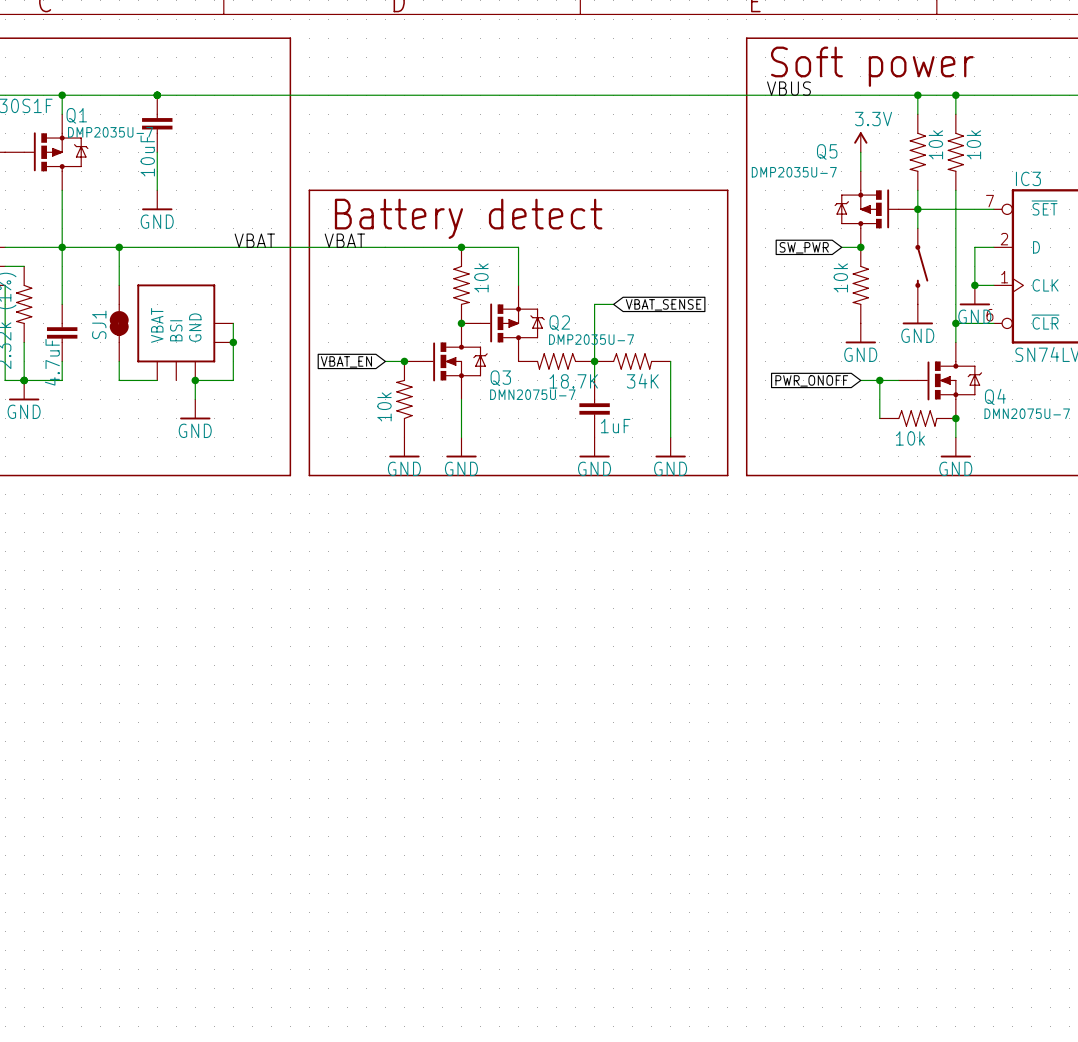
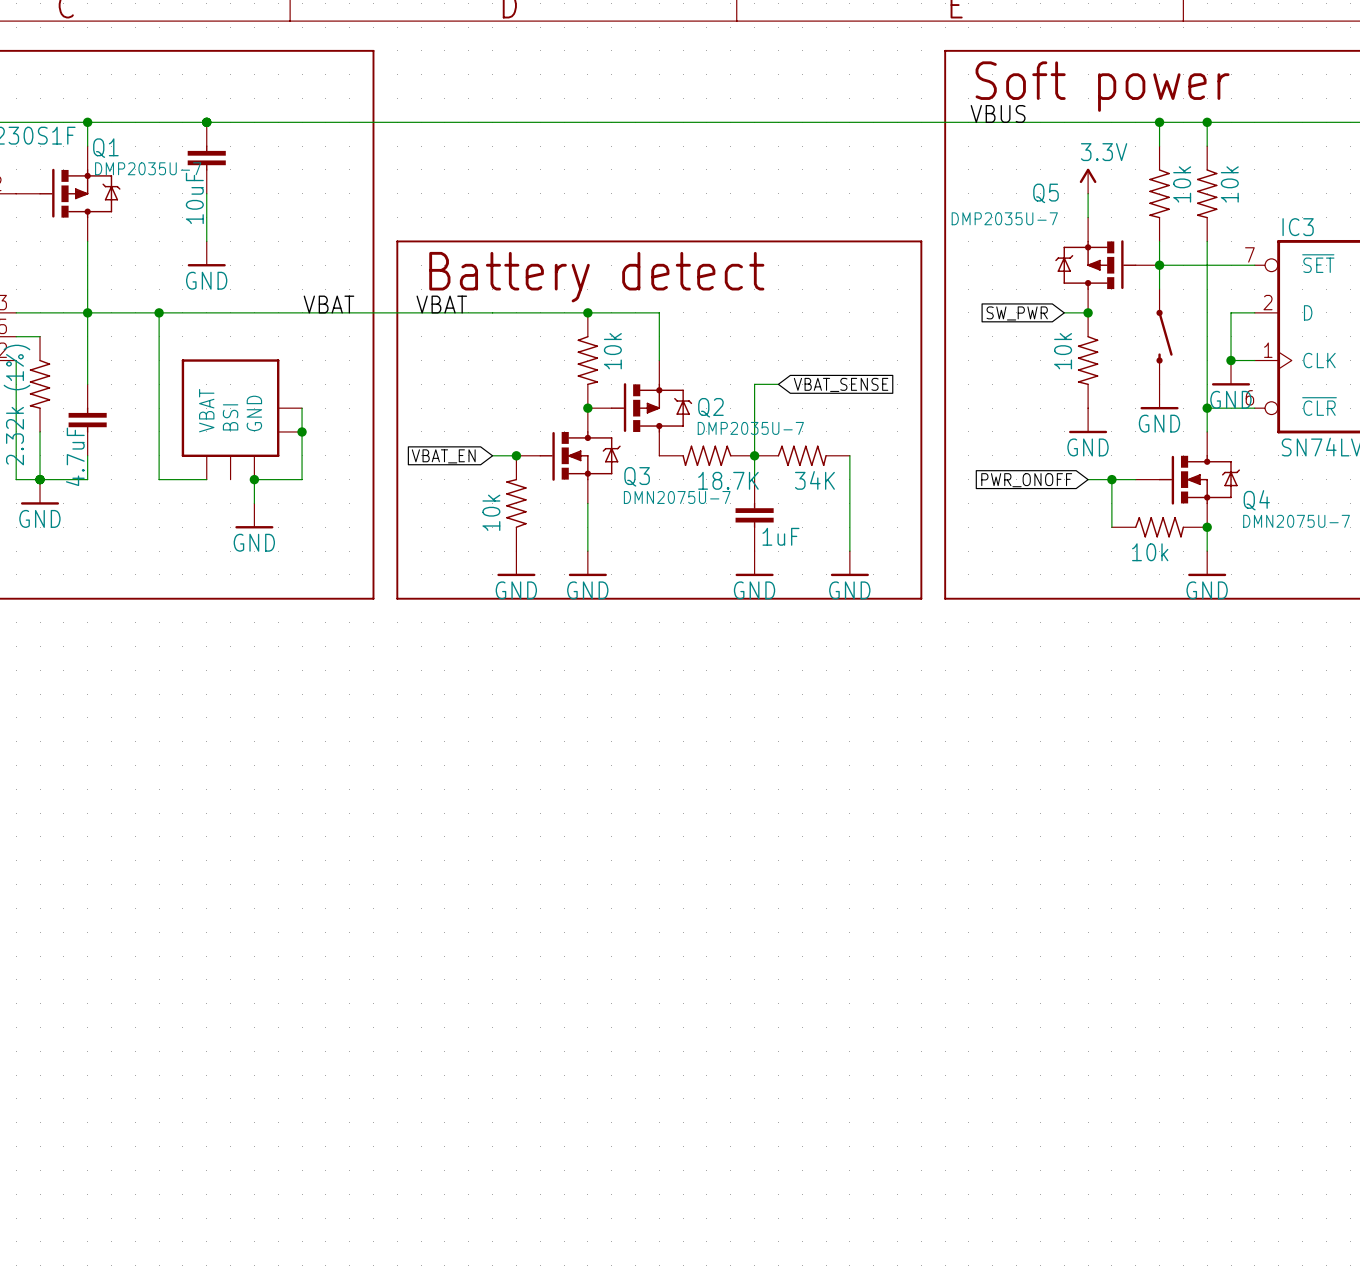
SJ1: (119, 323) -> none

